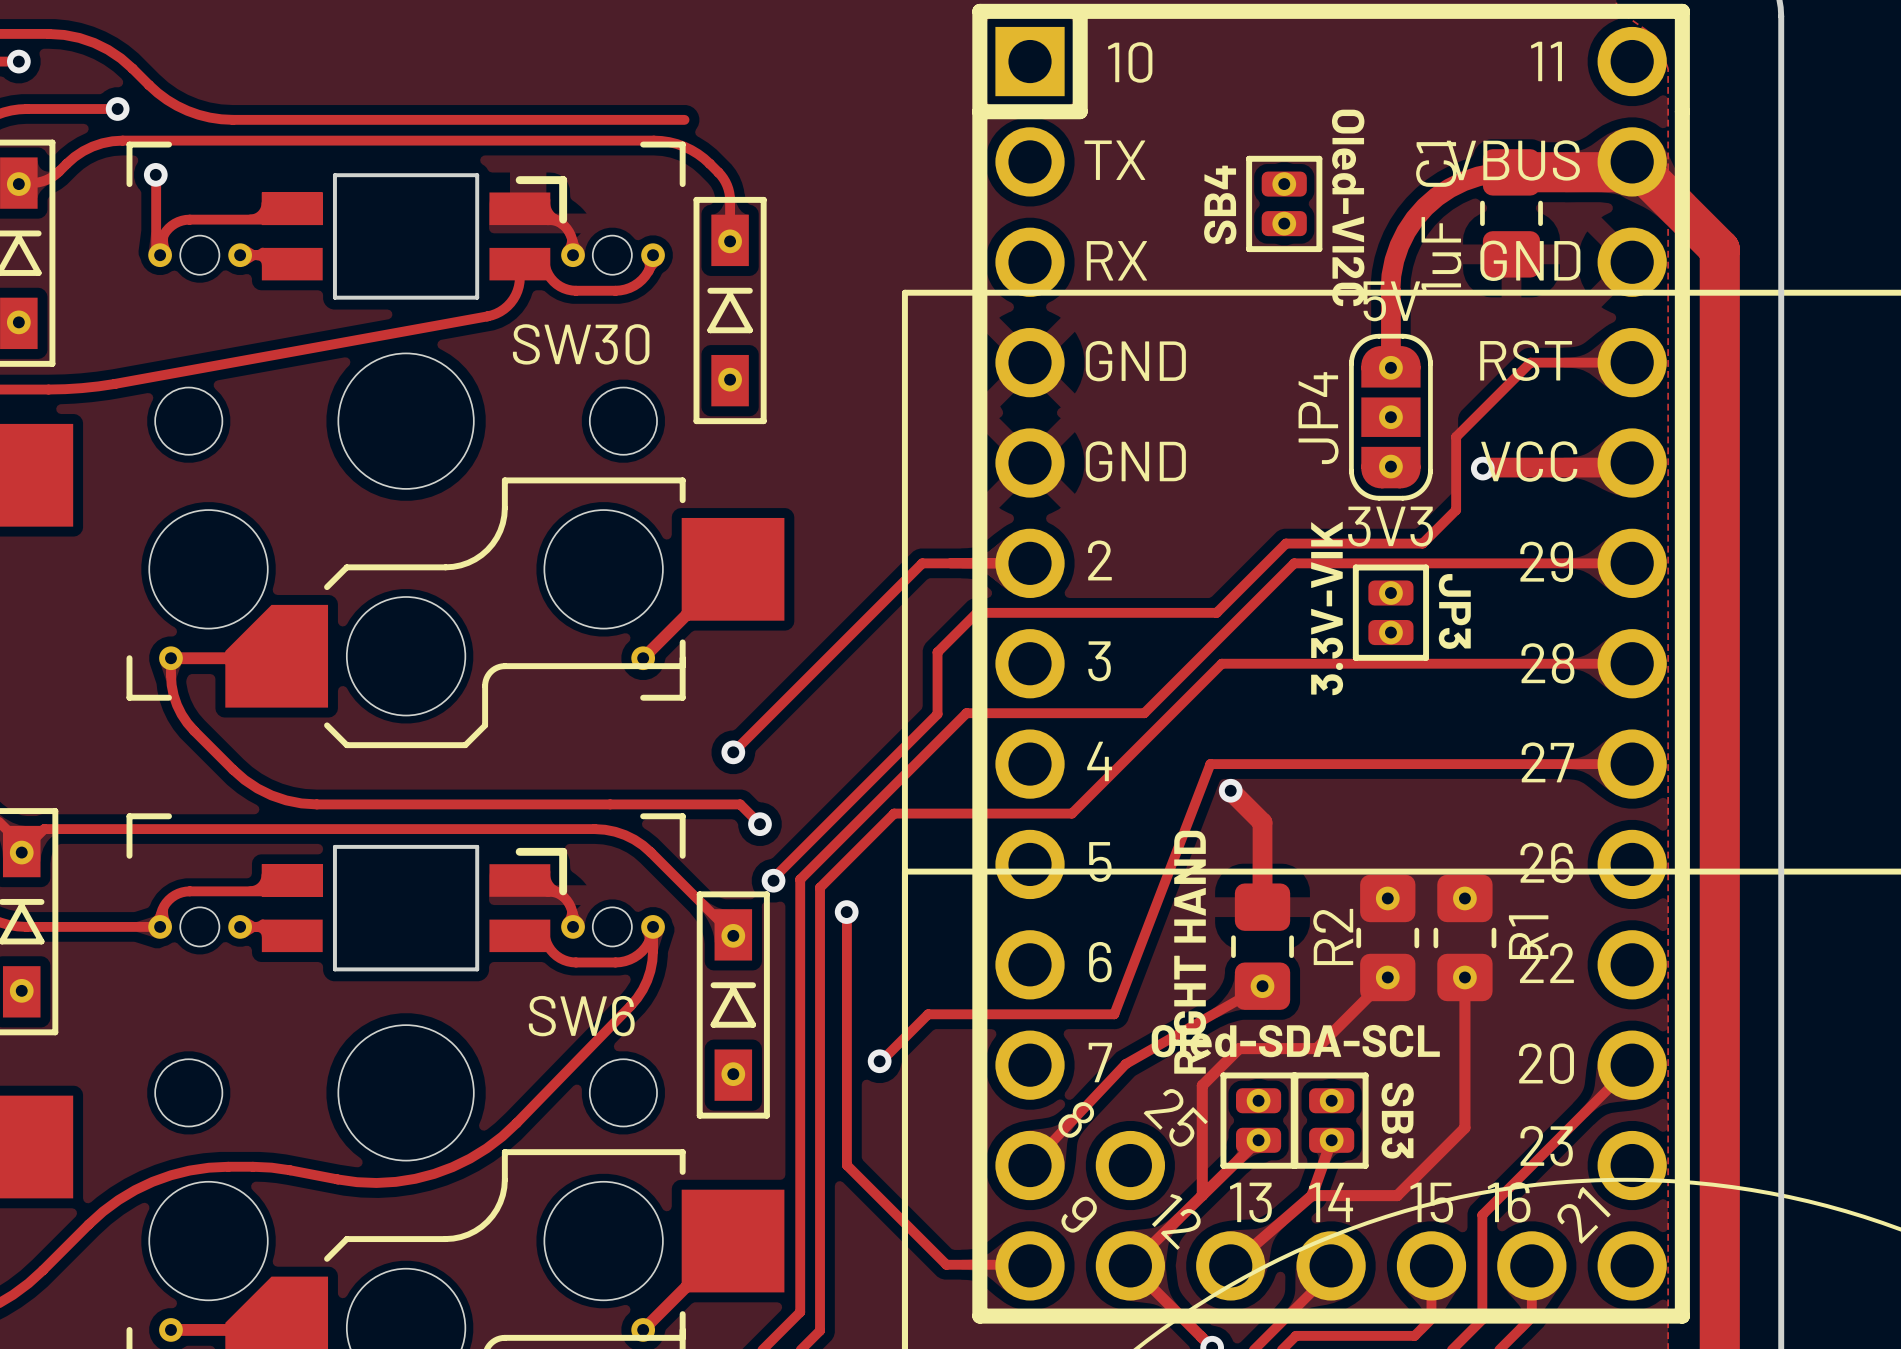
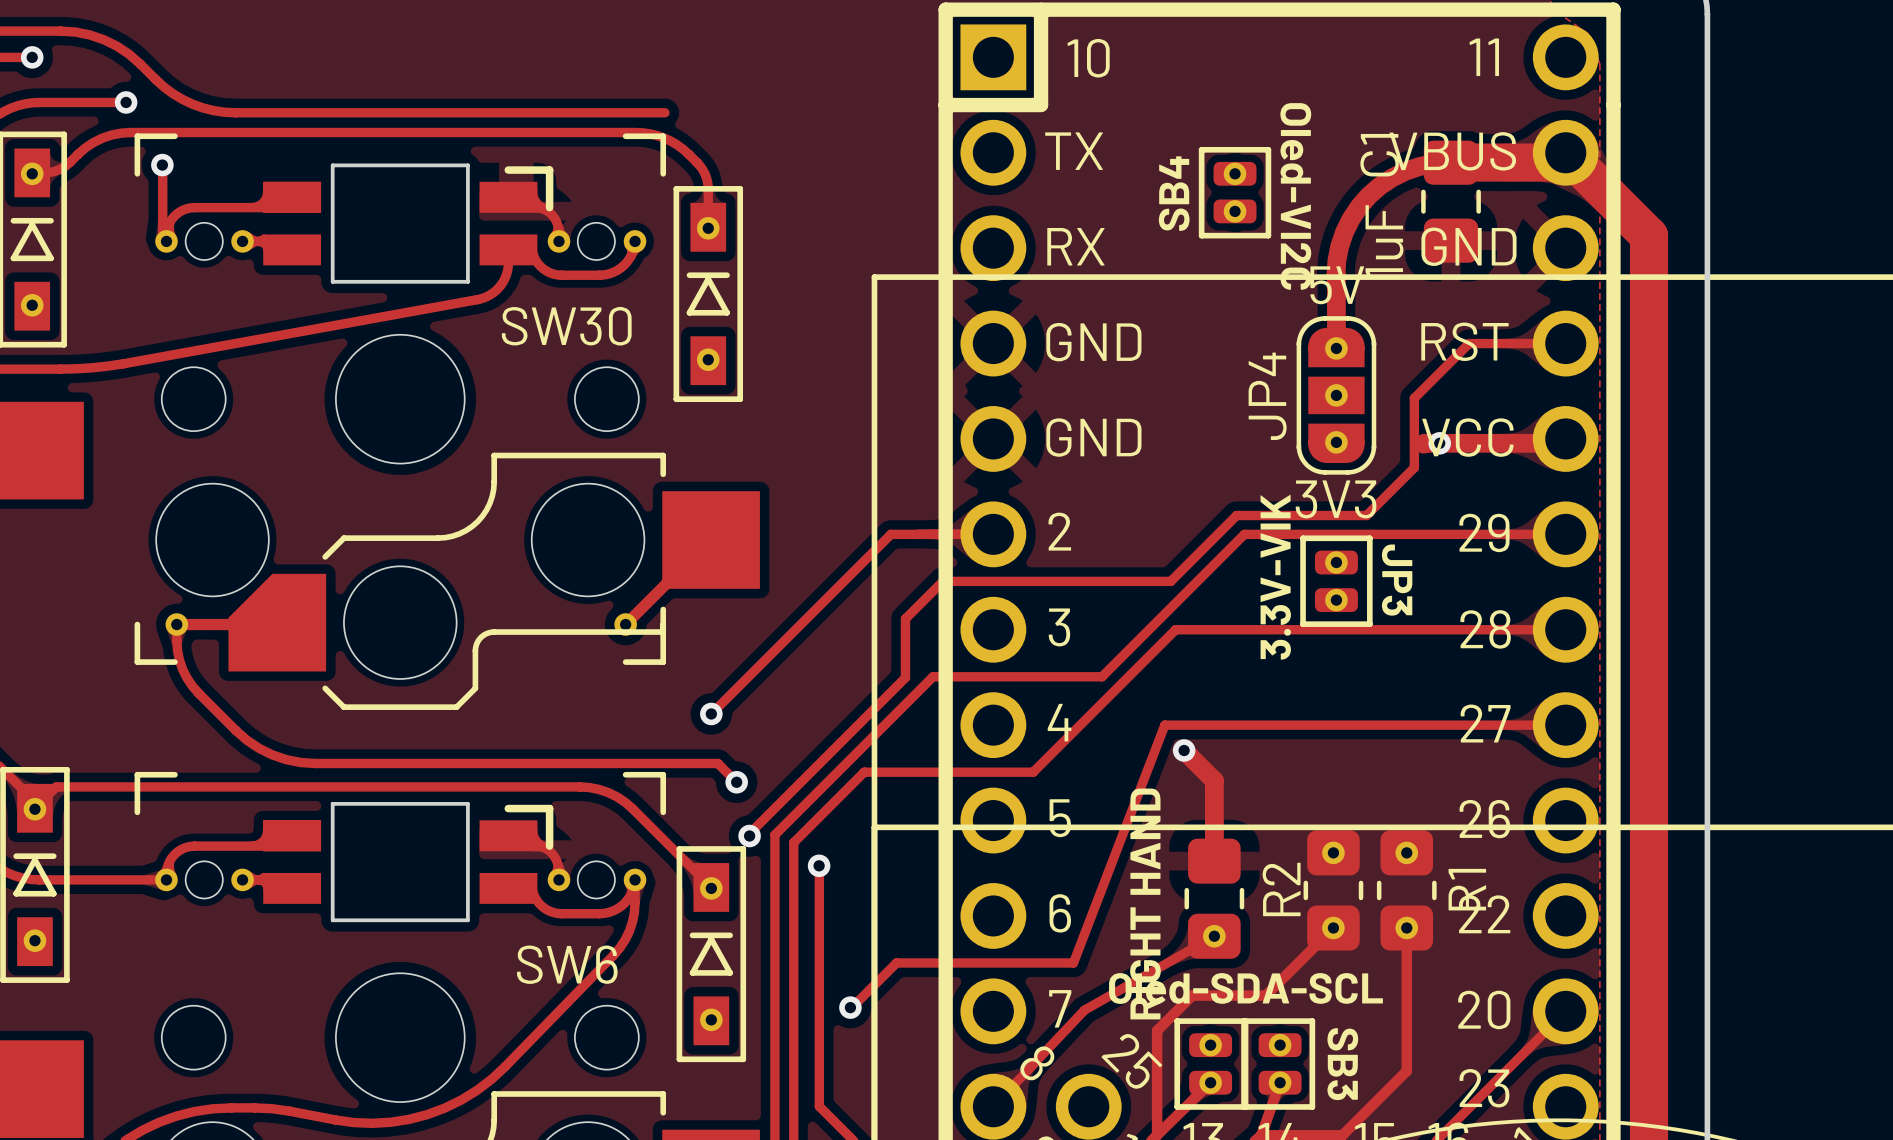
track: (1472, 420) (1456, 436) (1456, 510) -> (1414, 398) (1414, 467) (1398, 483)
via position: (1482, 468) -> (1439, 443)

